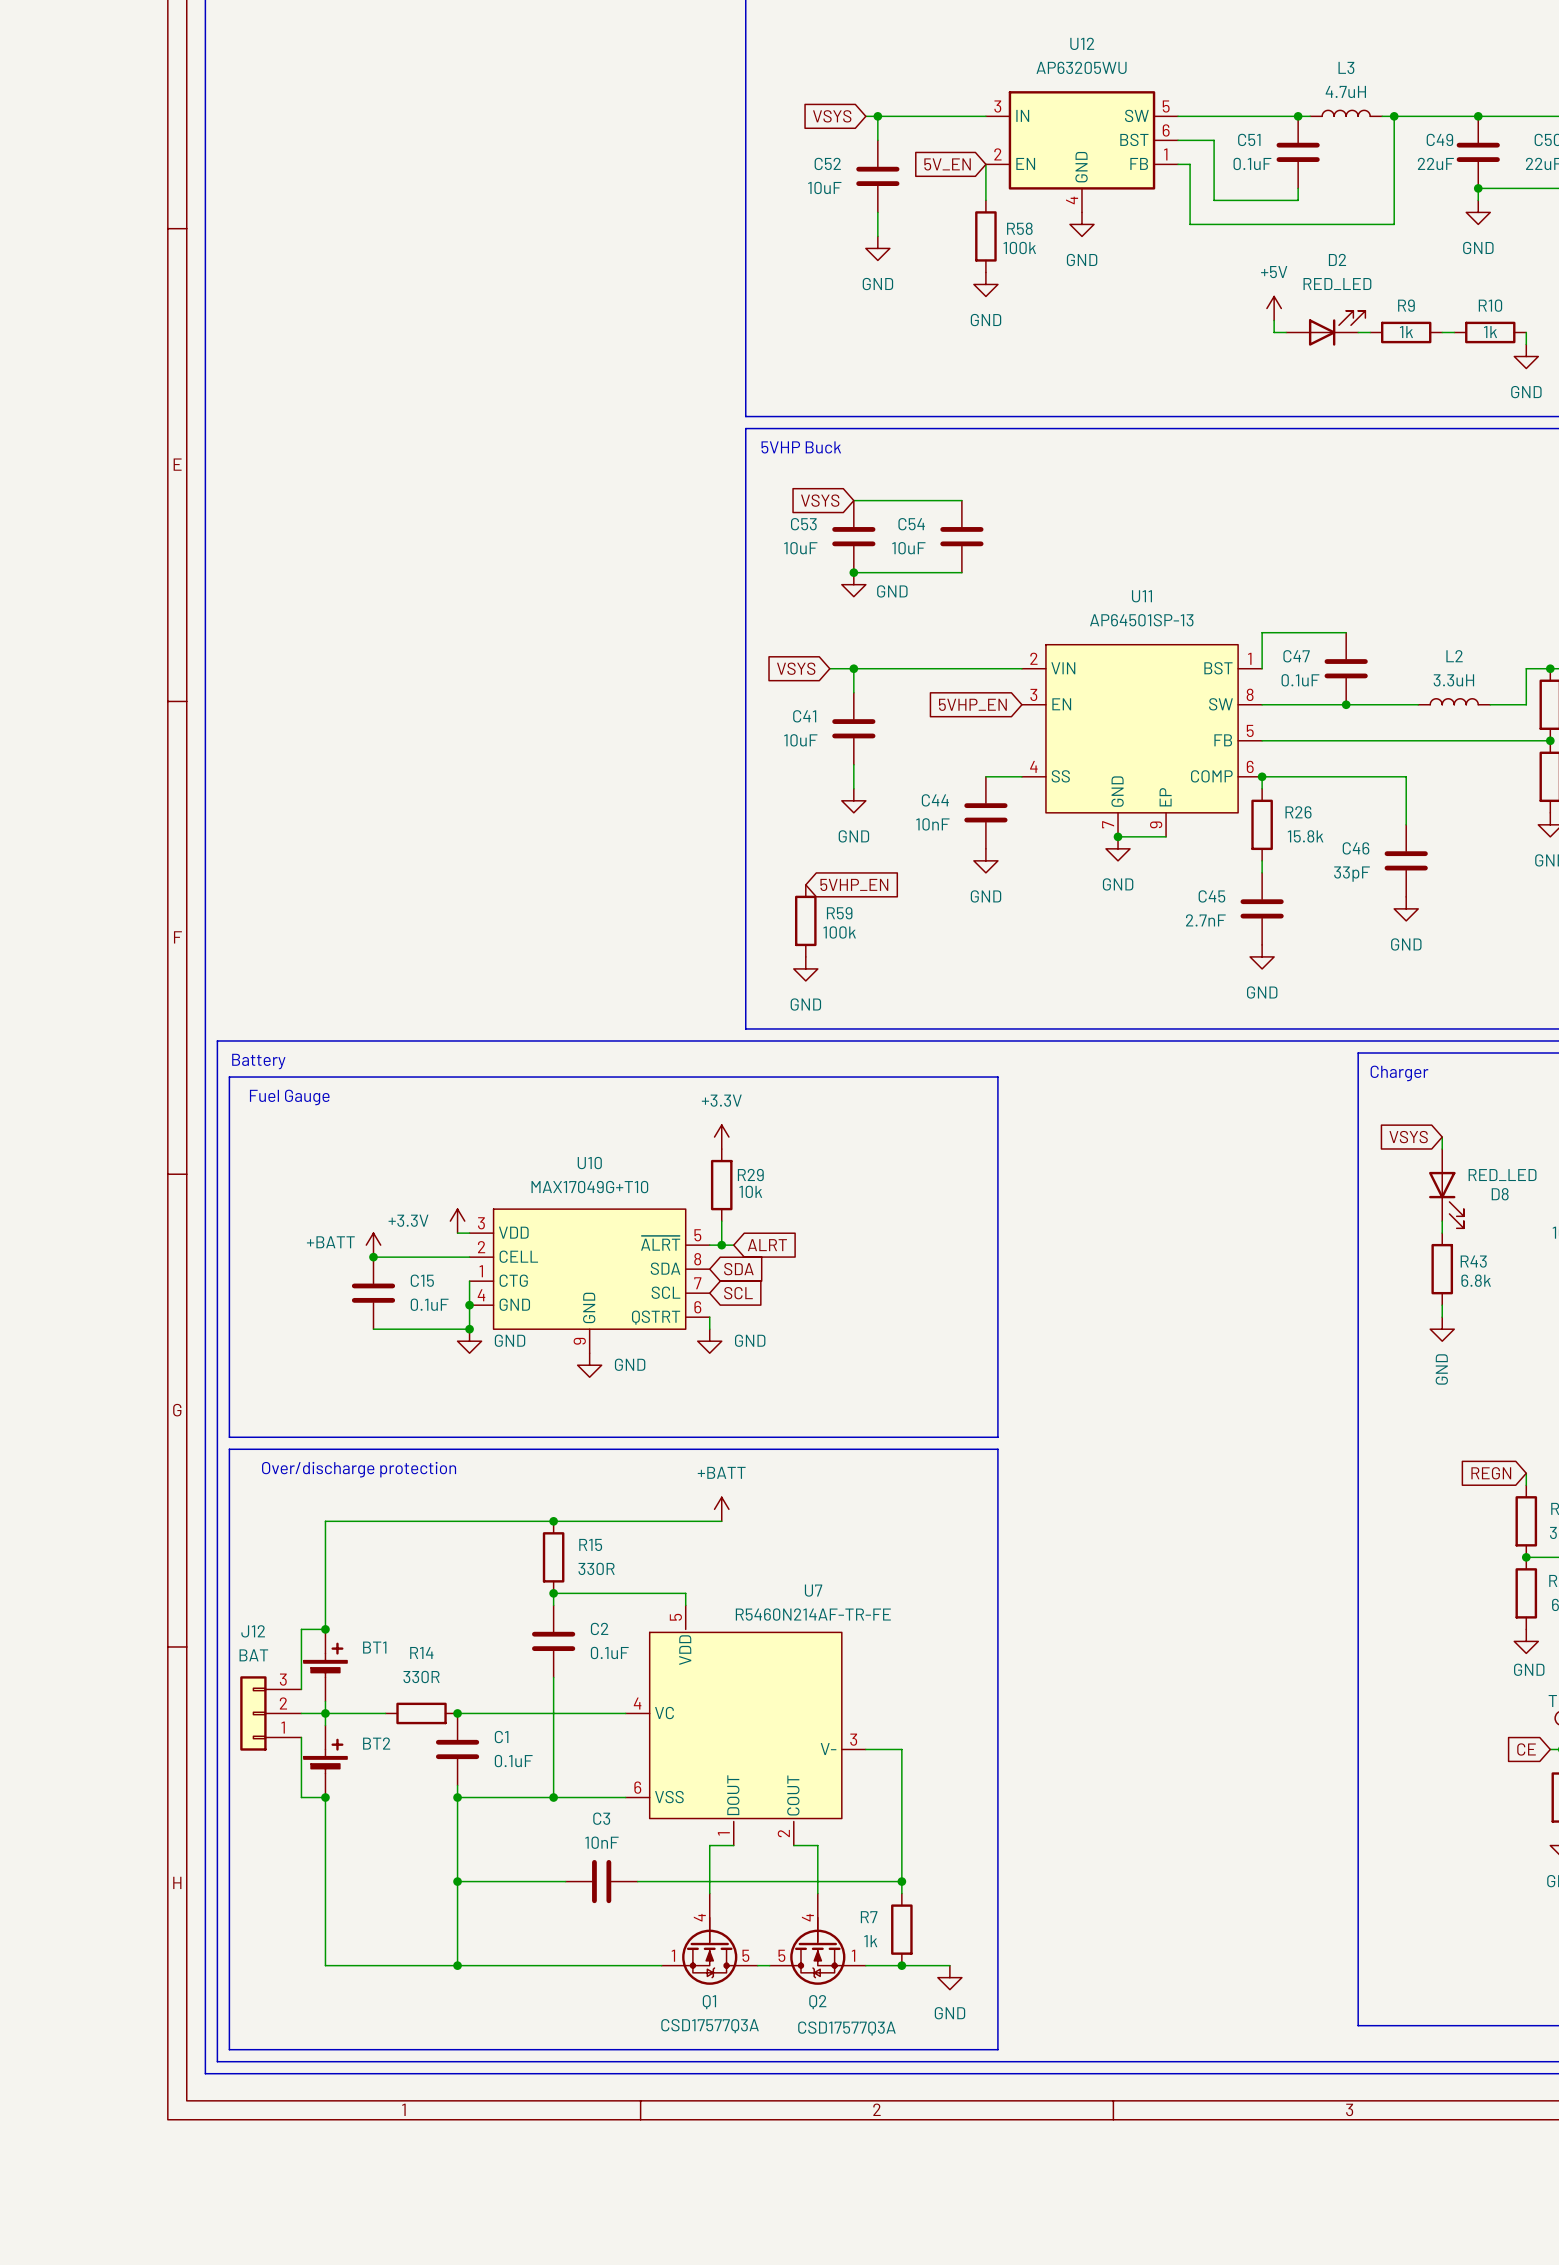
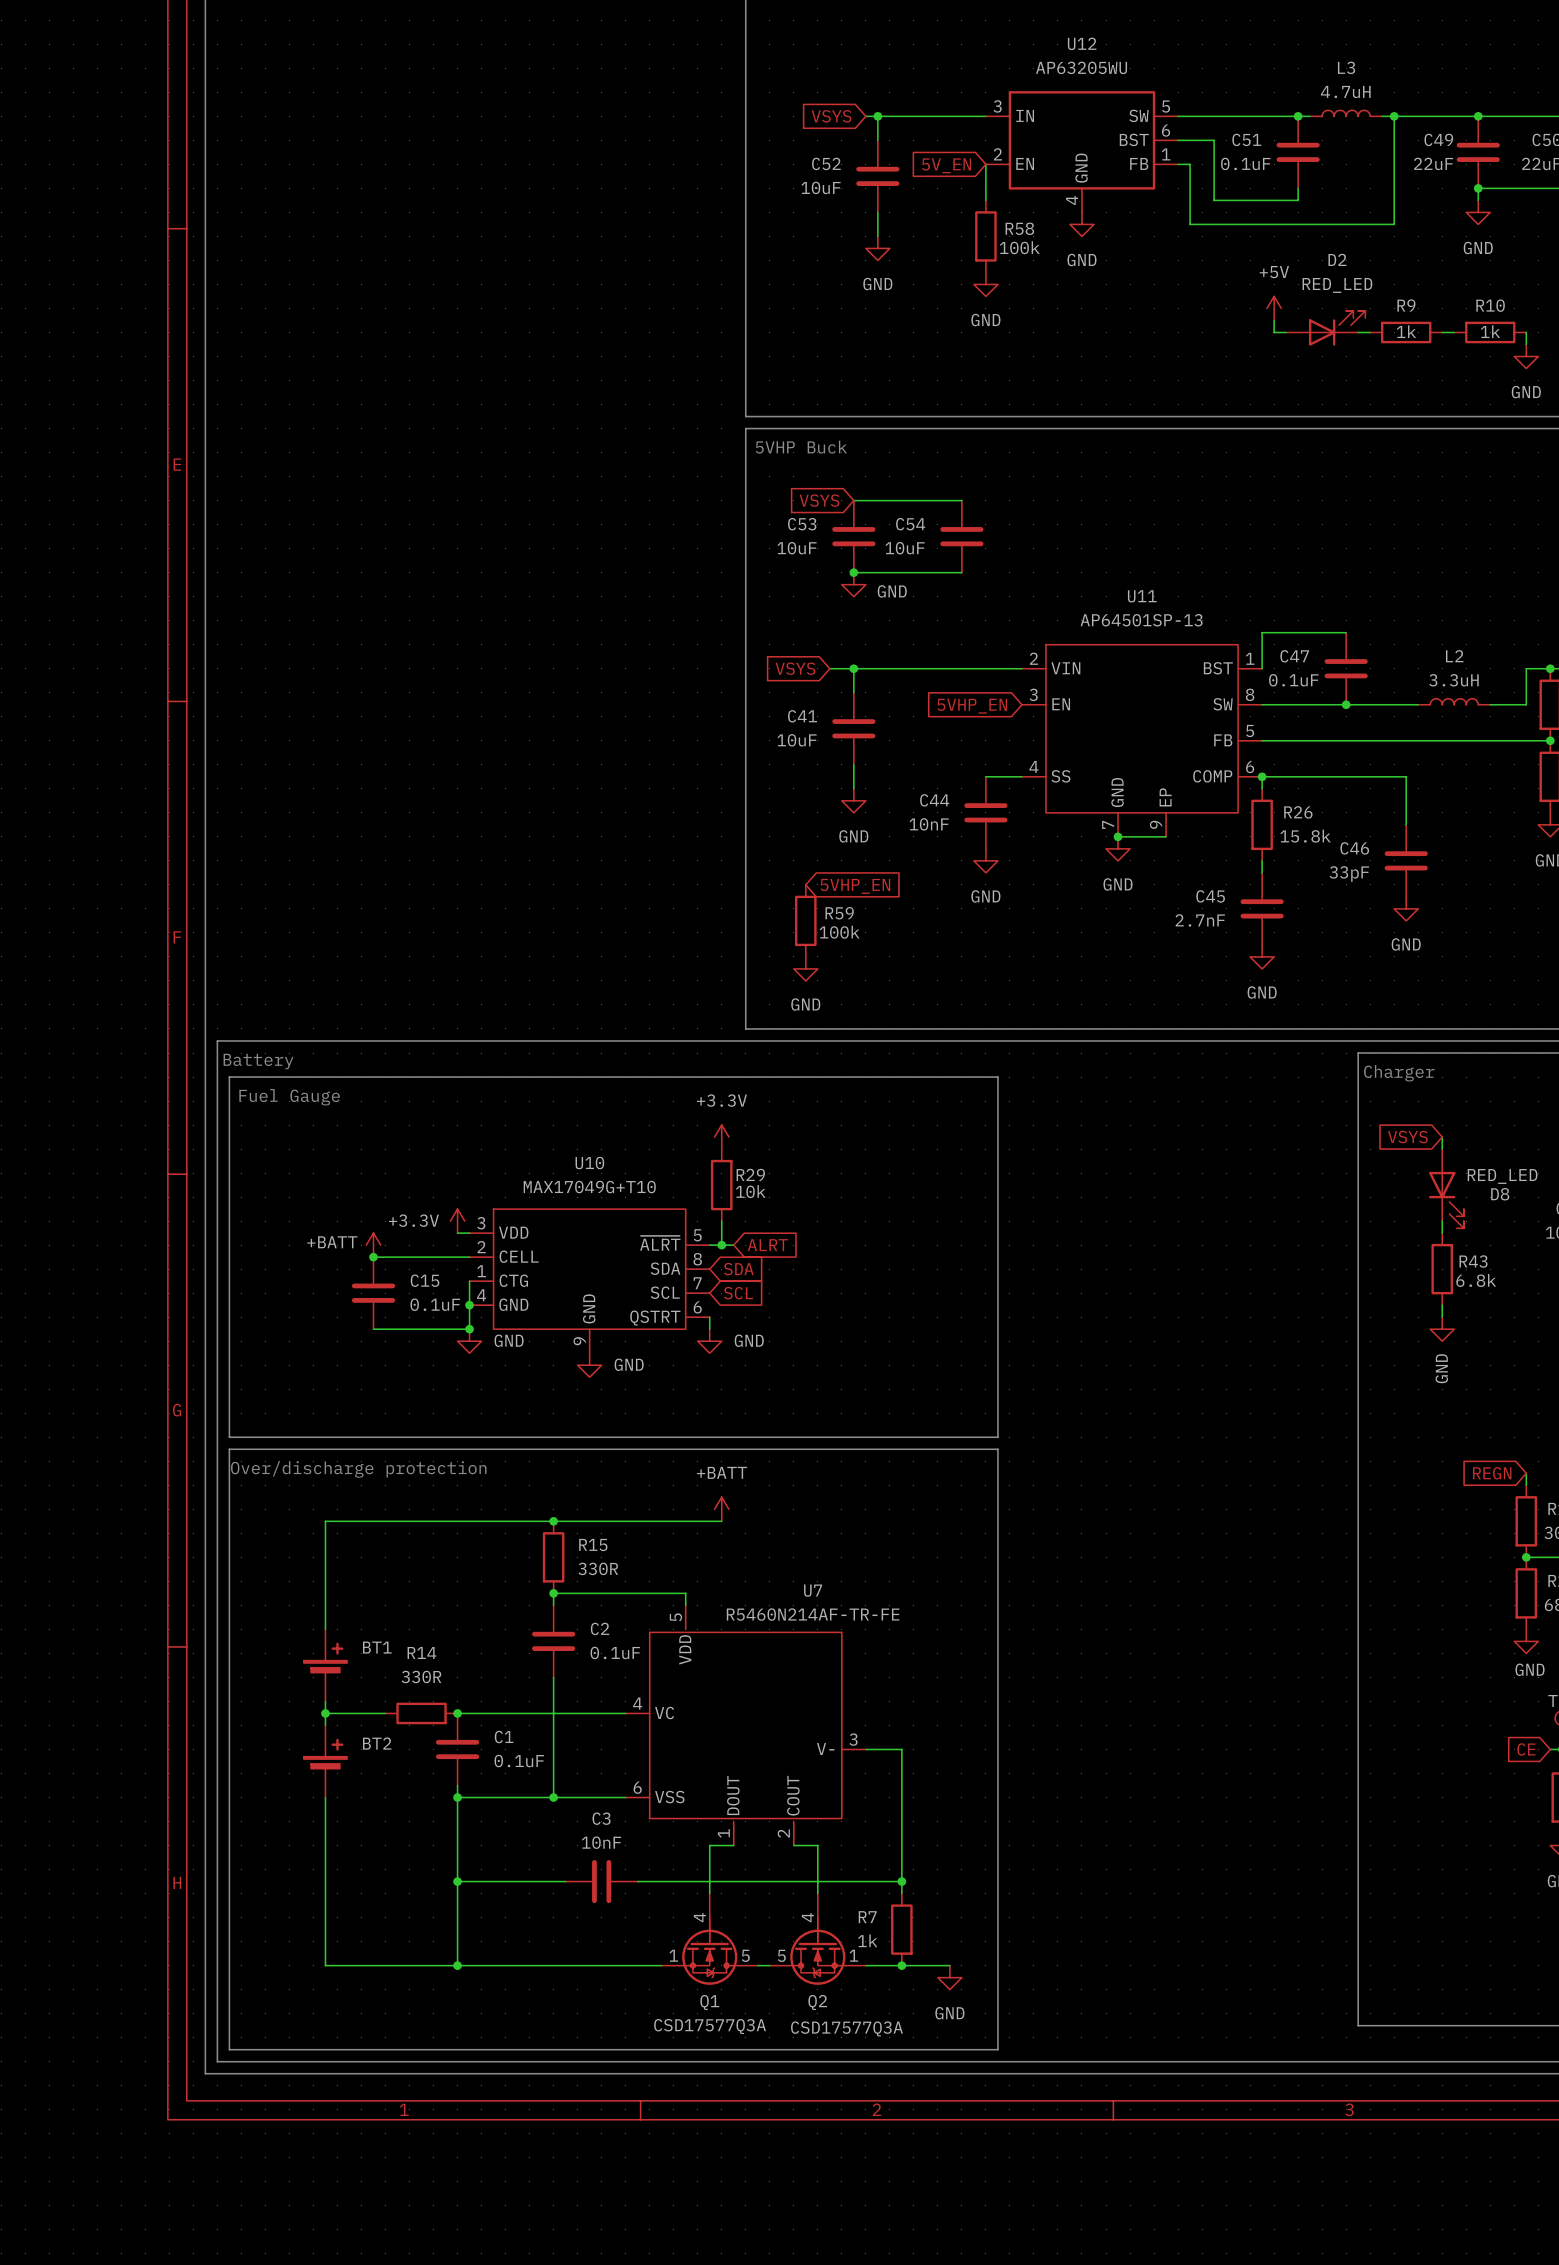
wire: (325, 1629) (301, 1629) (301, 1689) -> none
junction: (325, 1629) -> none
J12: BAT (270, 1713) -> none
wire: (301, 1713) (325, 1713) -> none
wire: (301, 1737) (301, 1797) (325, 1797) -> none
junction: (325, 1797) -> none

